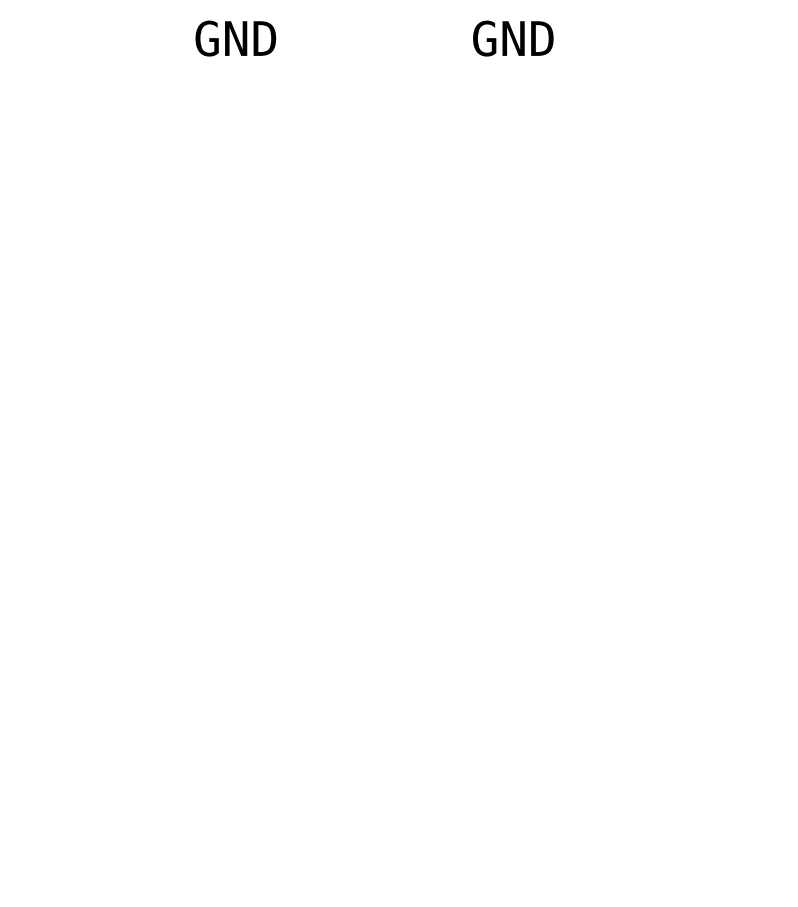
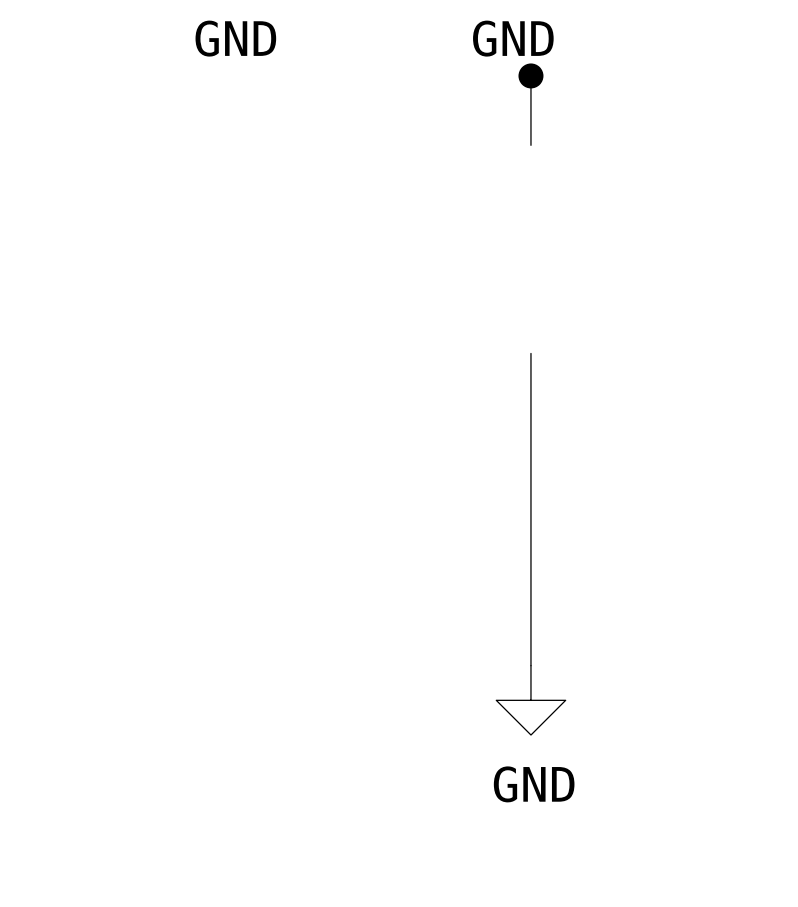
wire: none -> (530, 75) (530, 145)
junction: none -> (530, 75)
wire: none -> (530, 353) (530, 665)
power symbol: none -> GND (530, 700)

